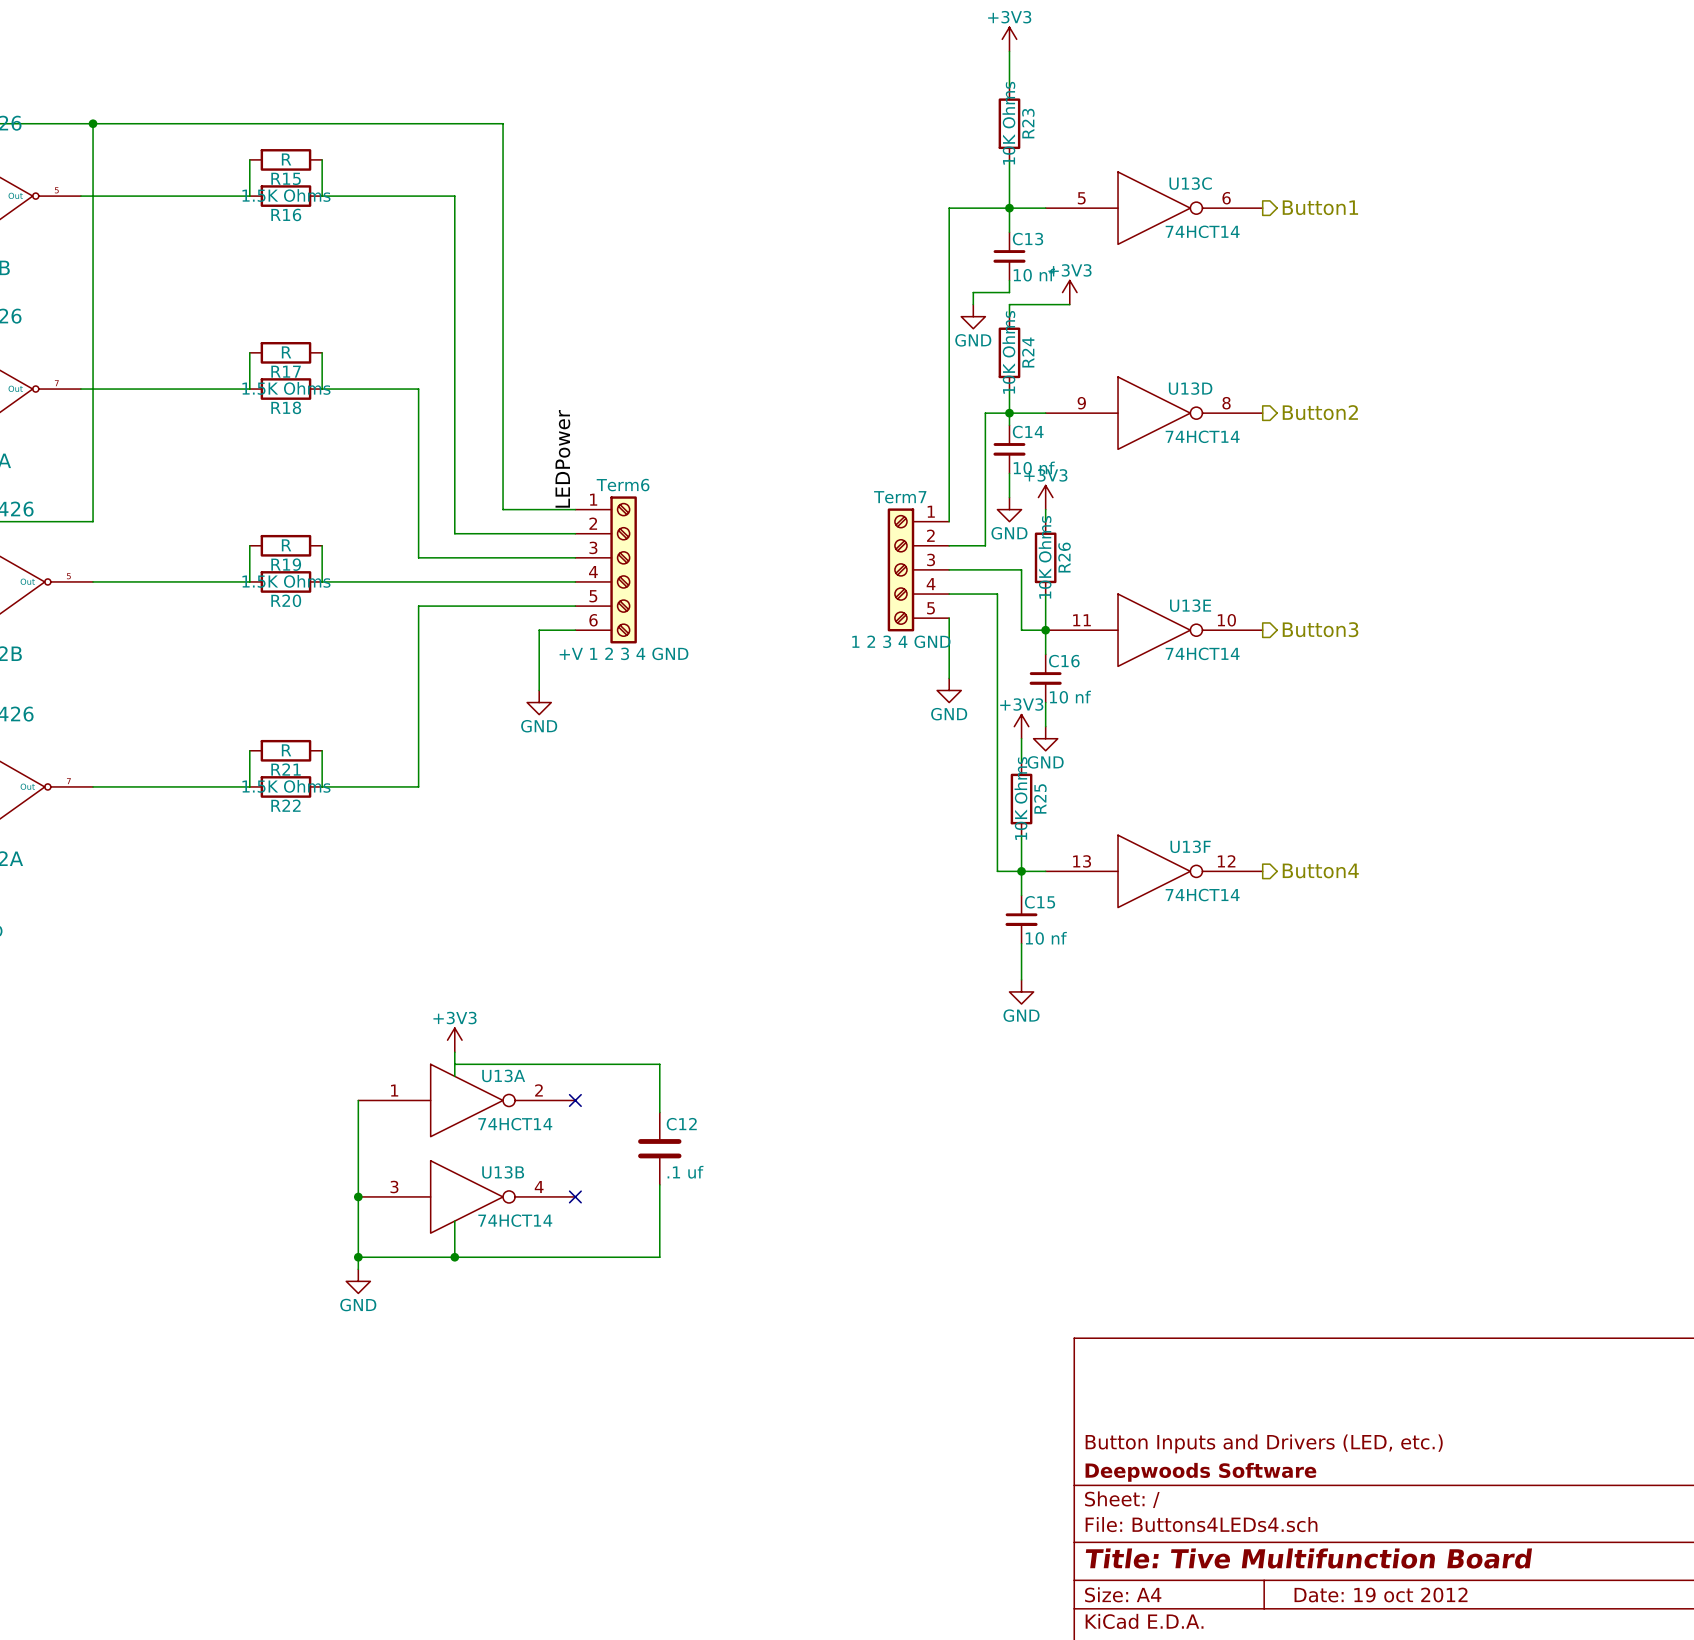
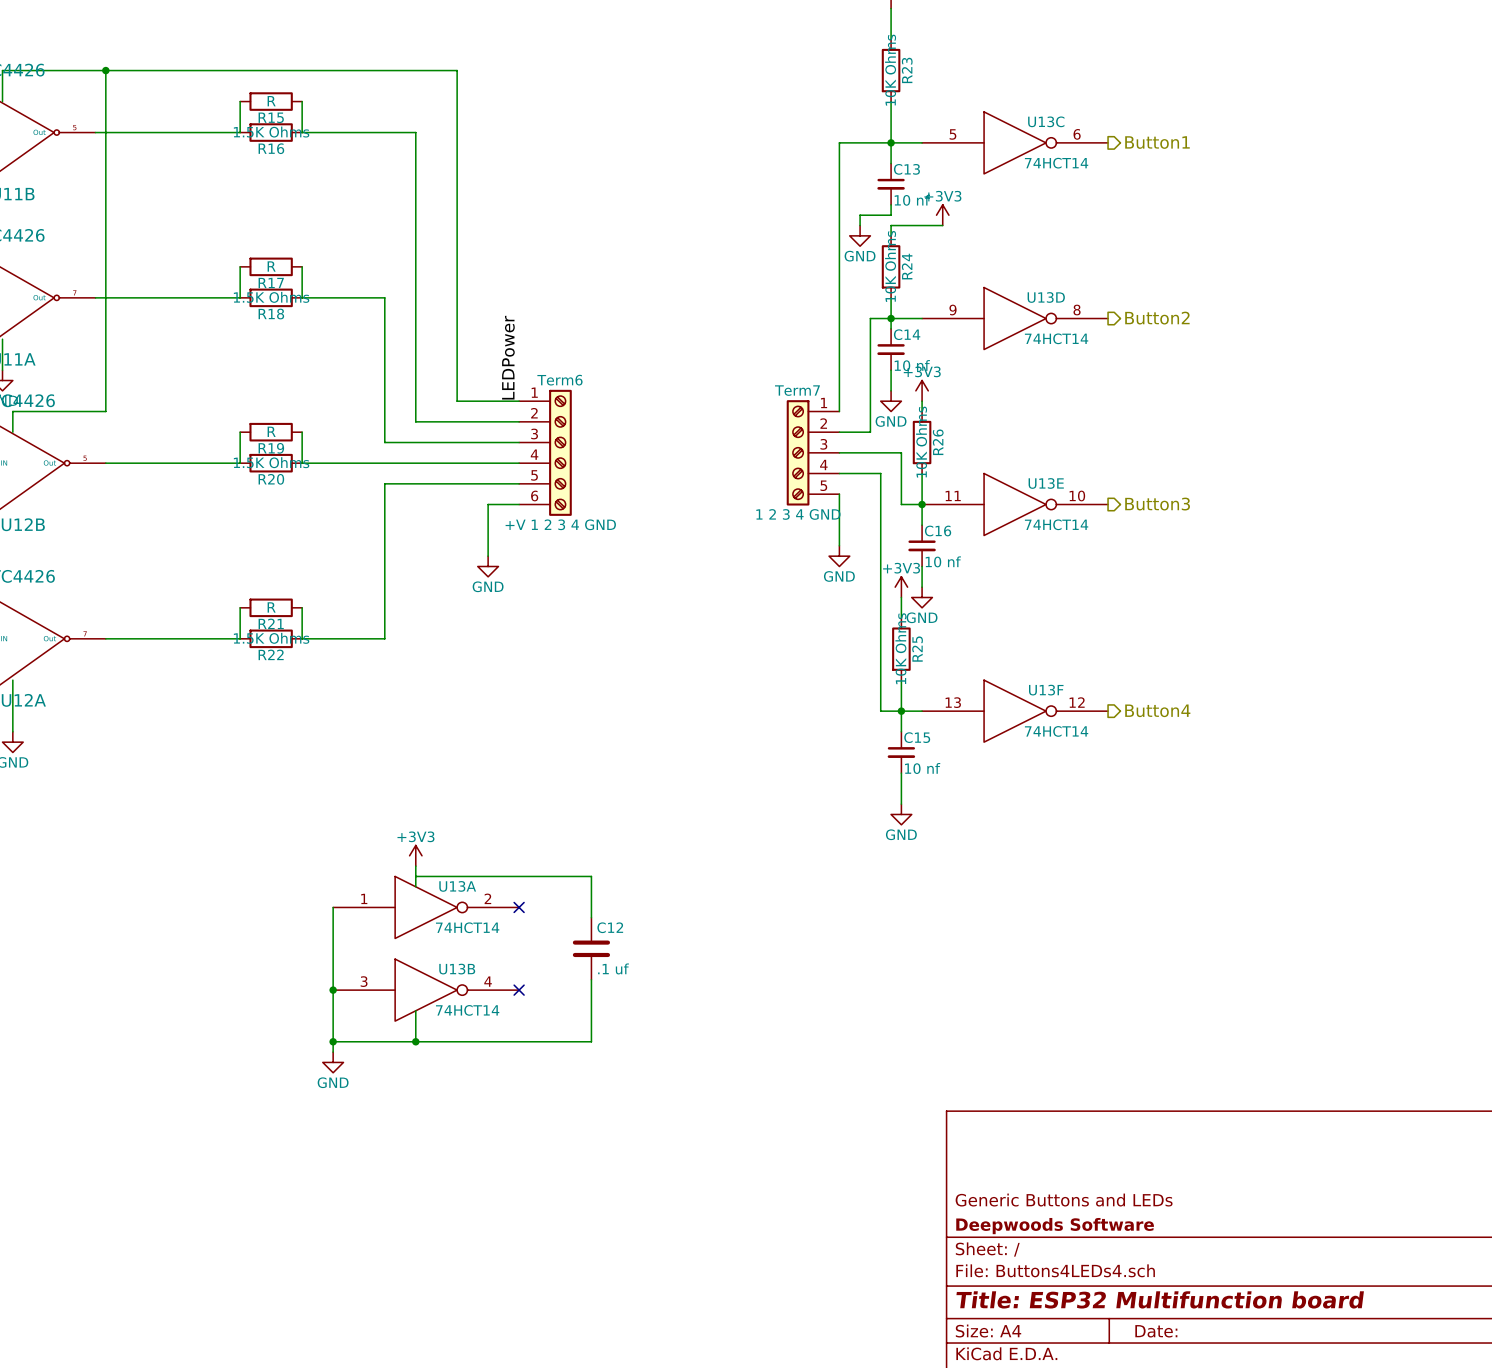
title block: Button Inputs and Drivers (LED, etc.) (1264, 1443) -> Generic Buttons and LEDs (1064, 1200)
title block: Title: Tive Multifunction Board (1308, 1558) -> Title: ESP32 Multifunction board (1160, 1299)
title block: Date: 19 oct 2012 (1381, 1595) -> Date: (1156, 1331)

